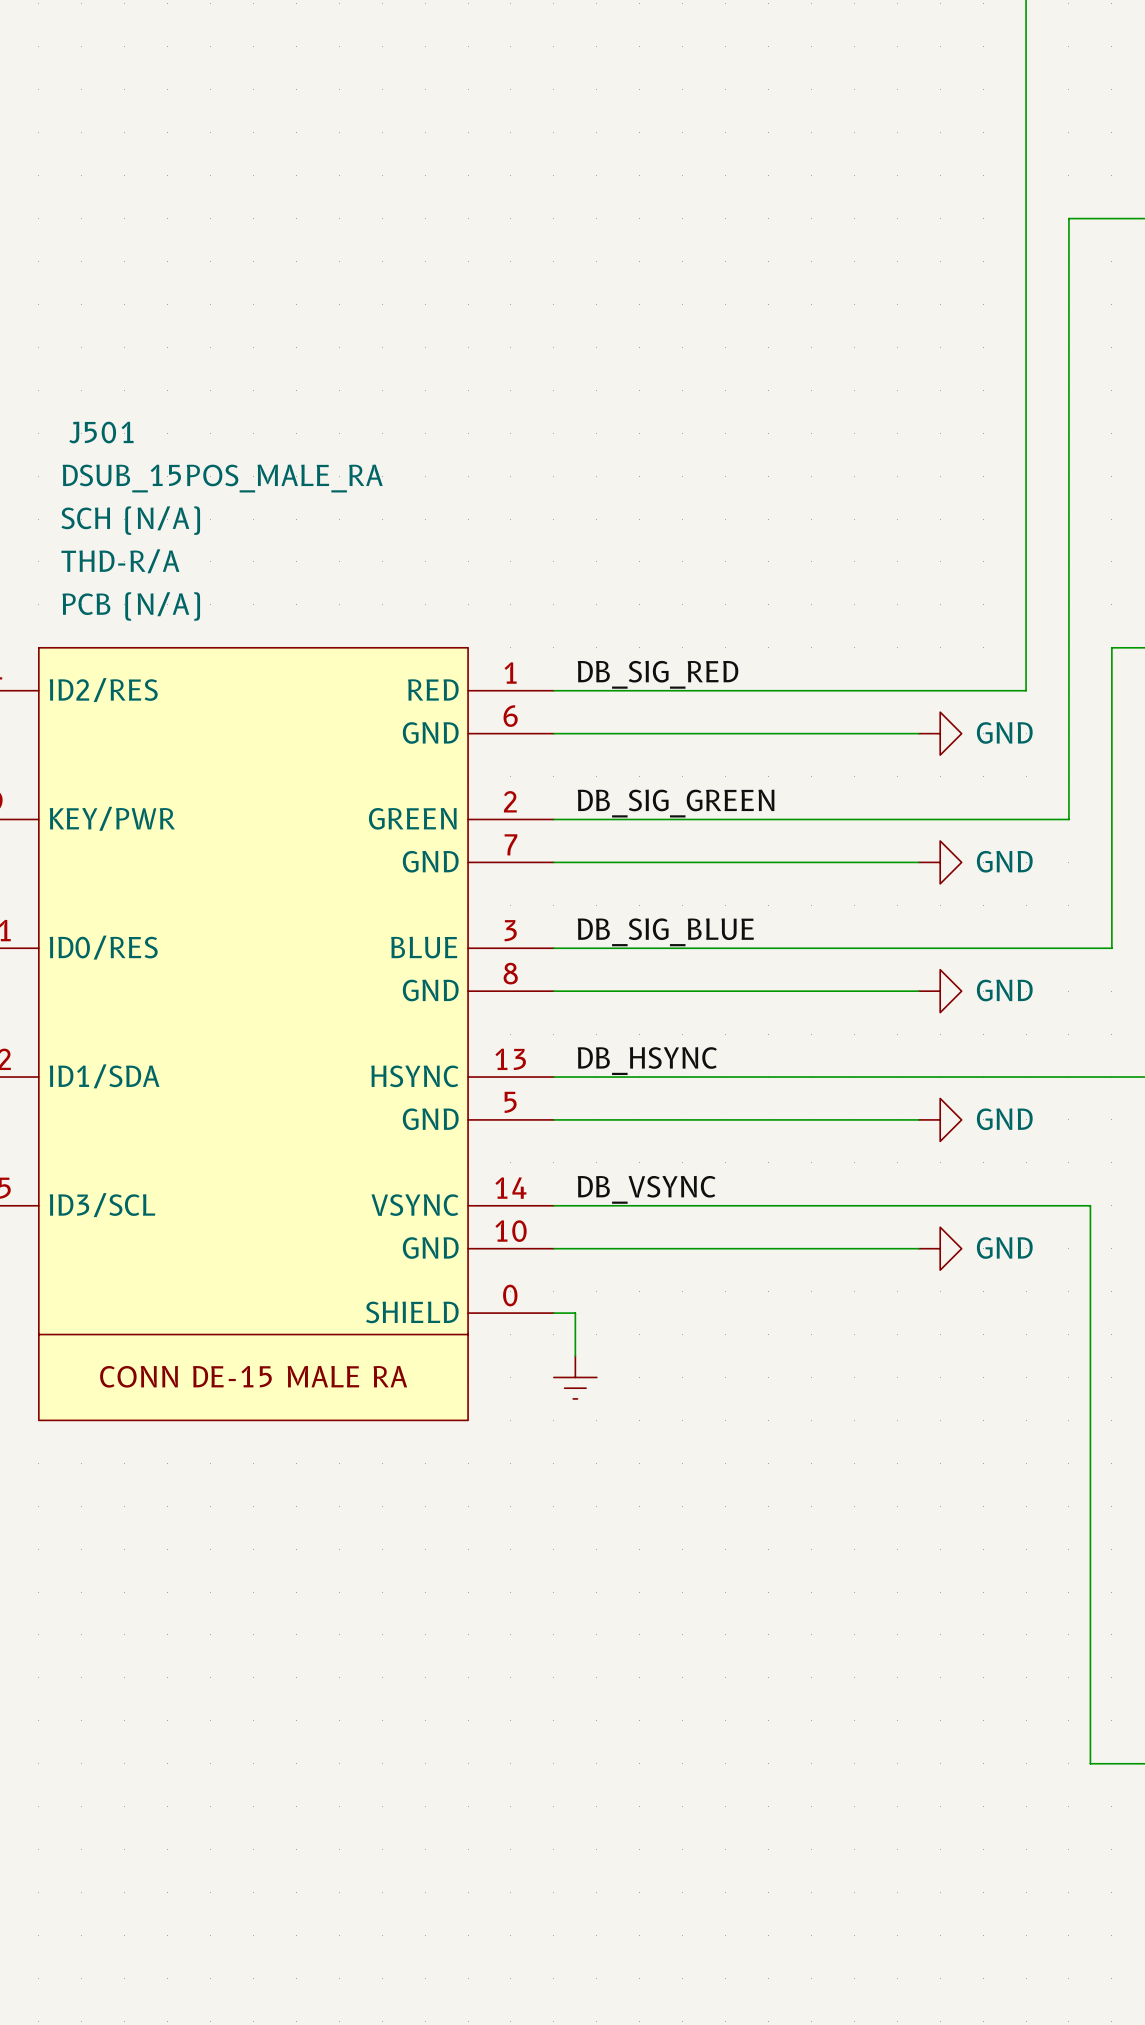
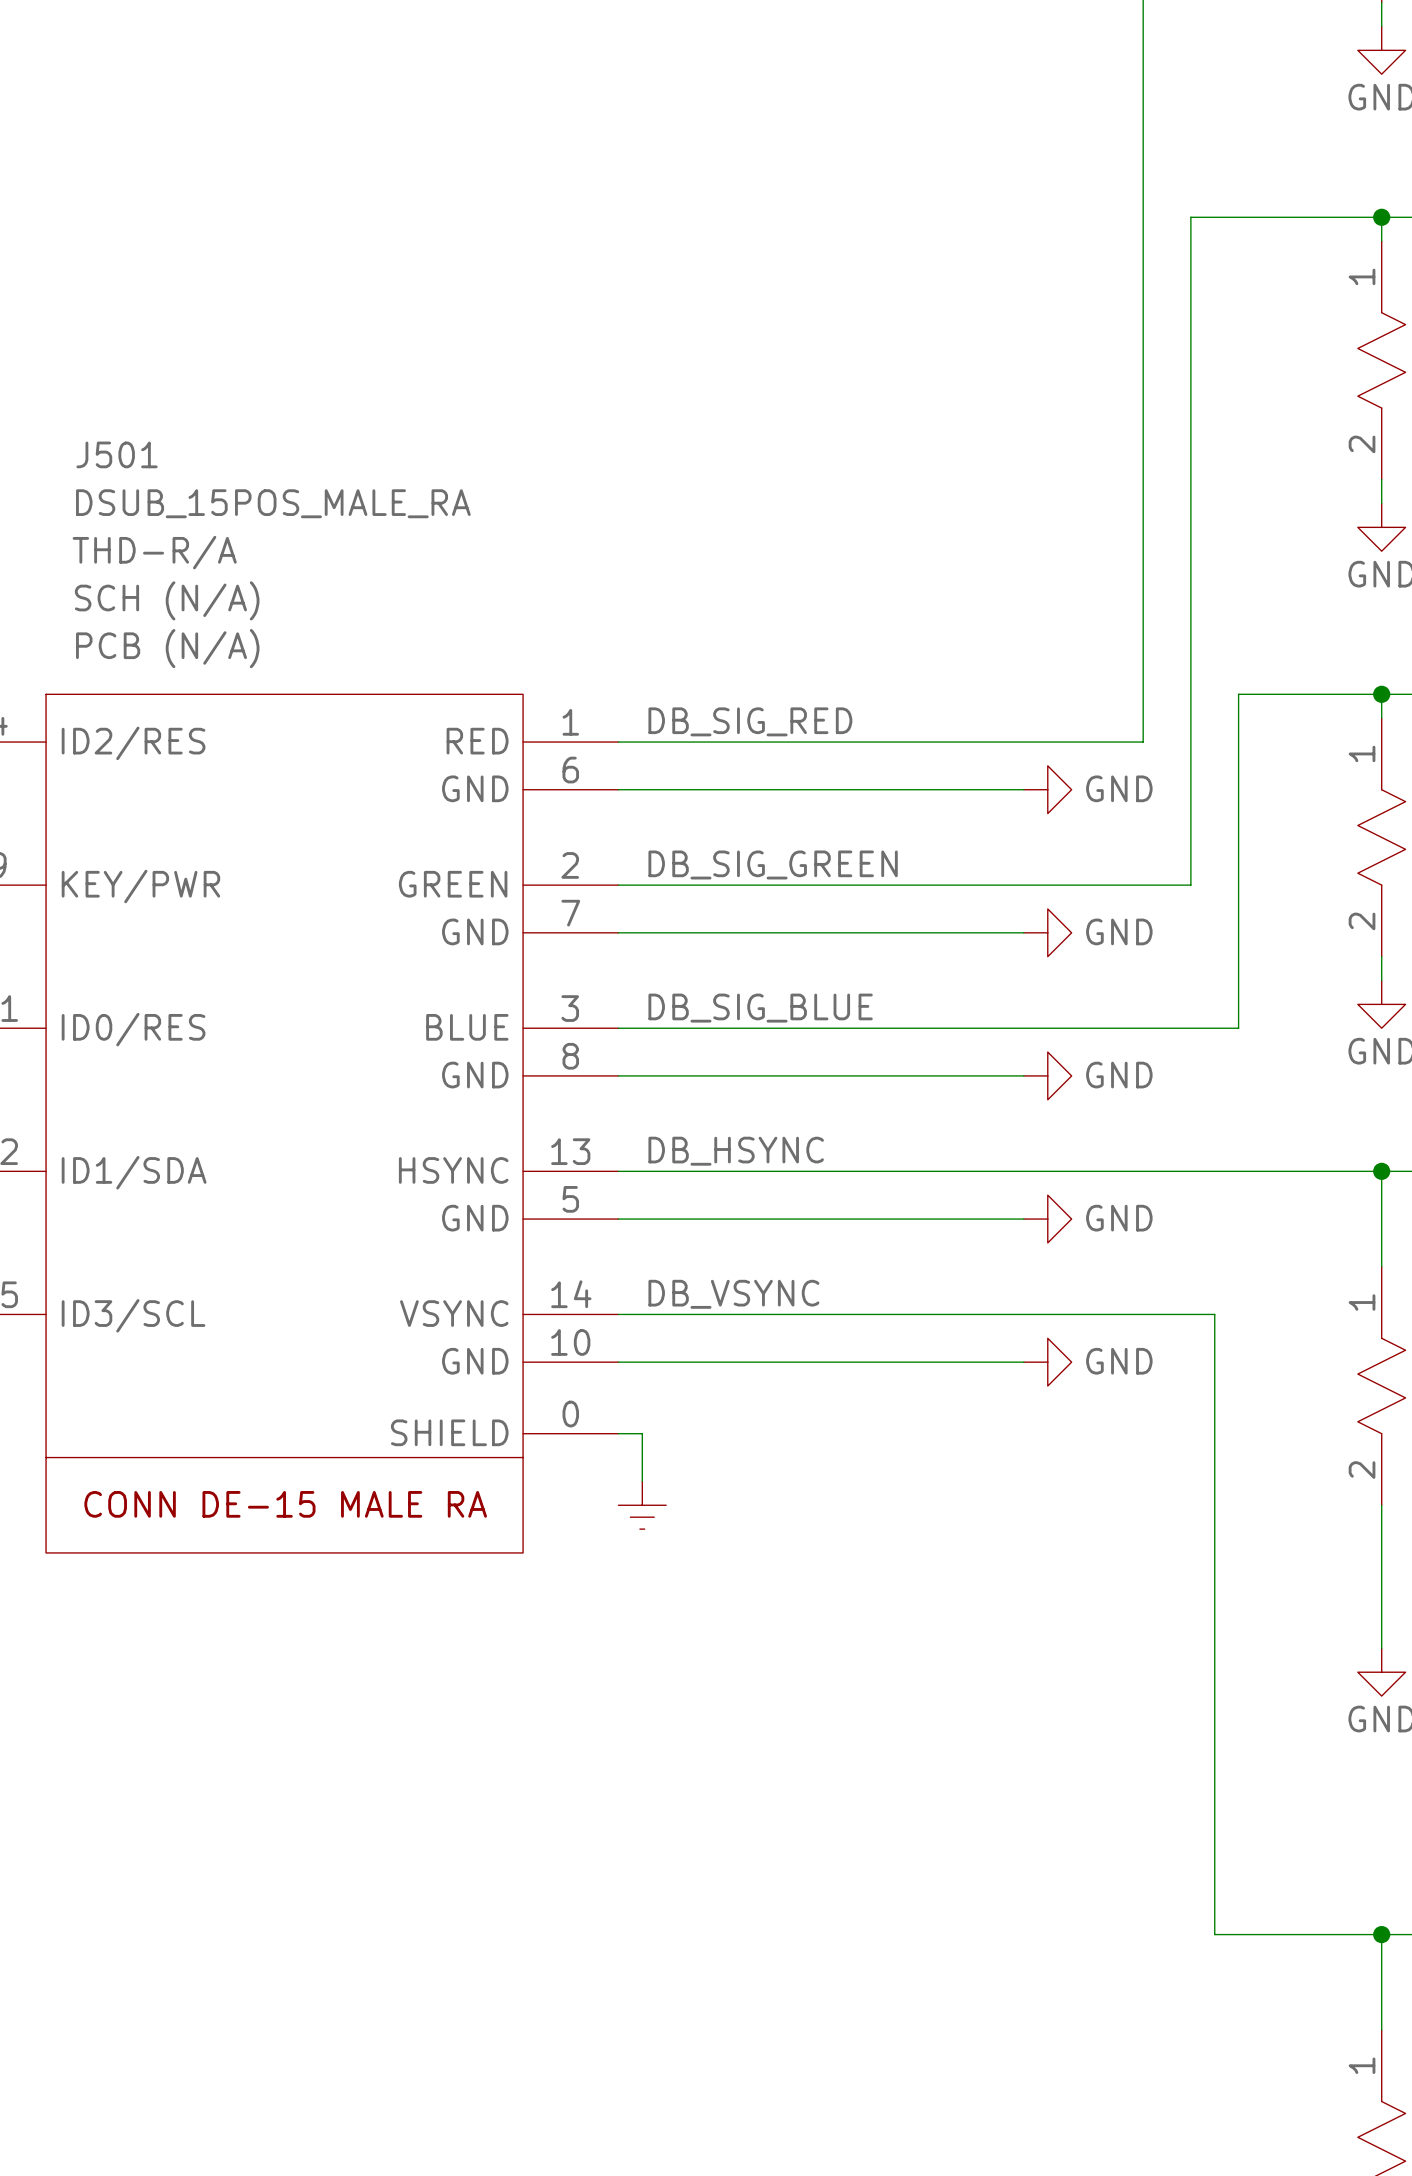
J501 text position: SCH (N/A) (130, 520) -> SCH (N/A) (167, 600)
J501 text position: THD-R/A (120, 561) -> THD-R/A (154, 552)

